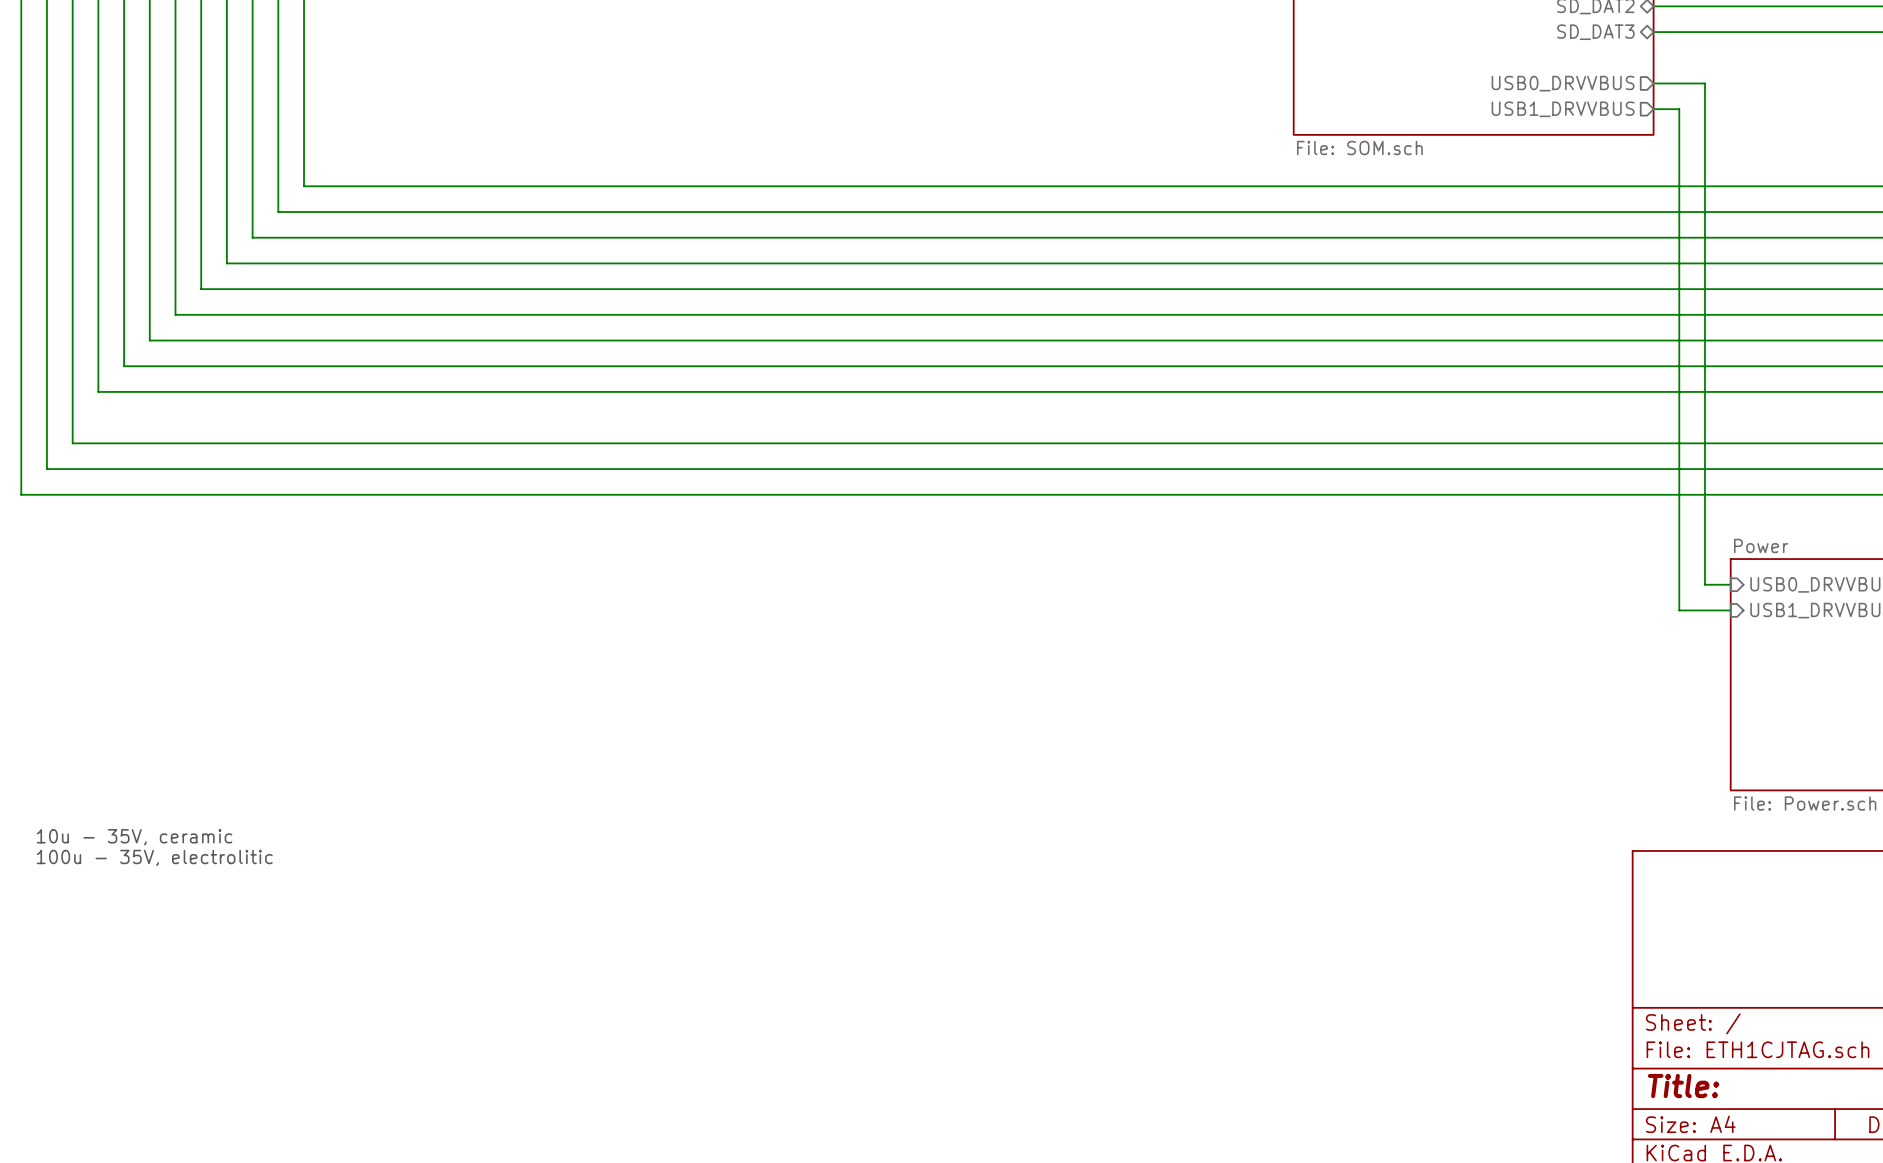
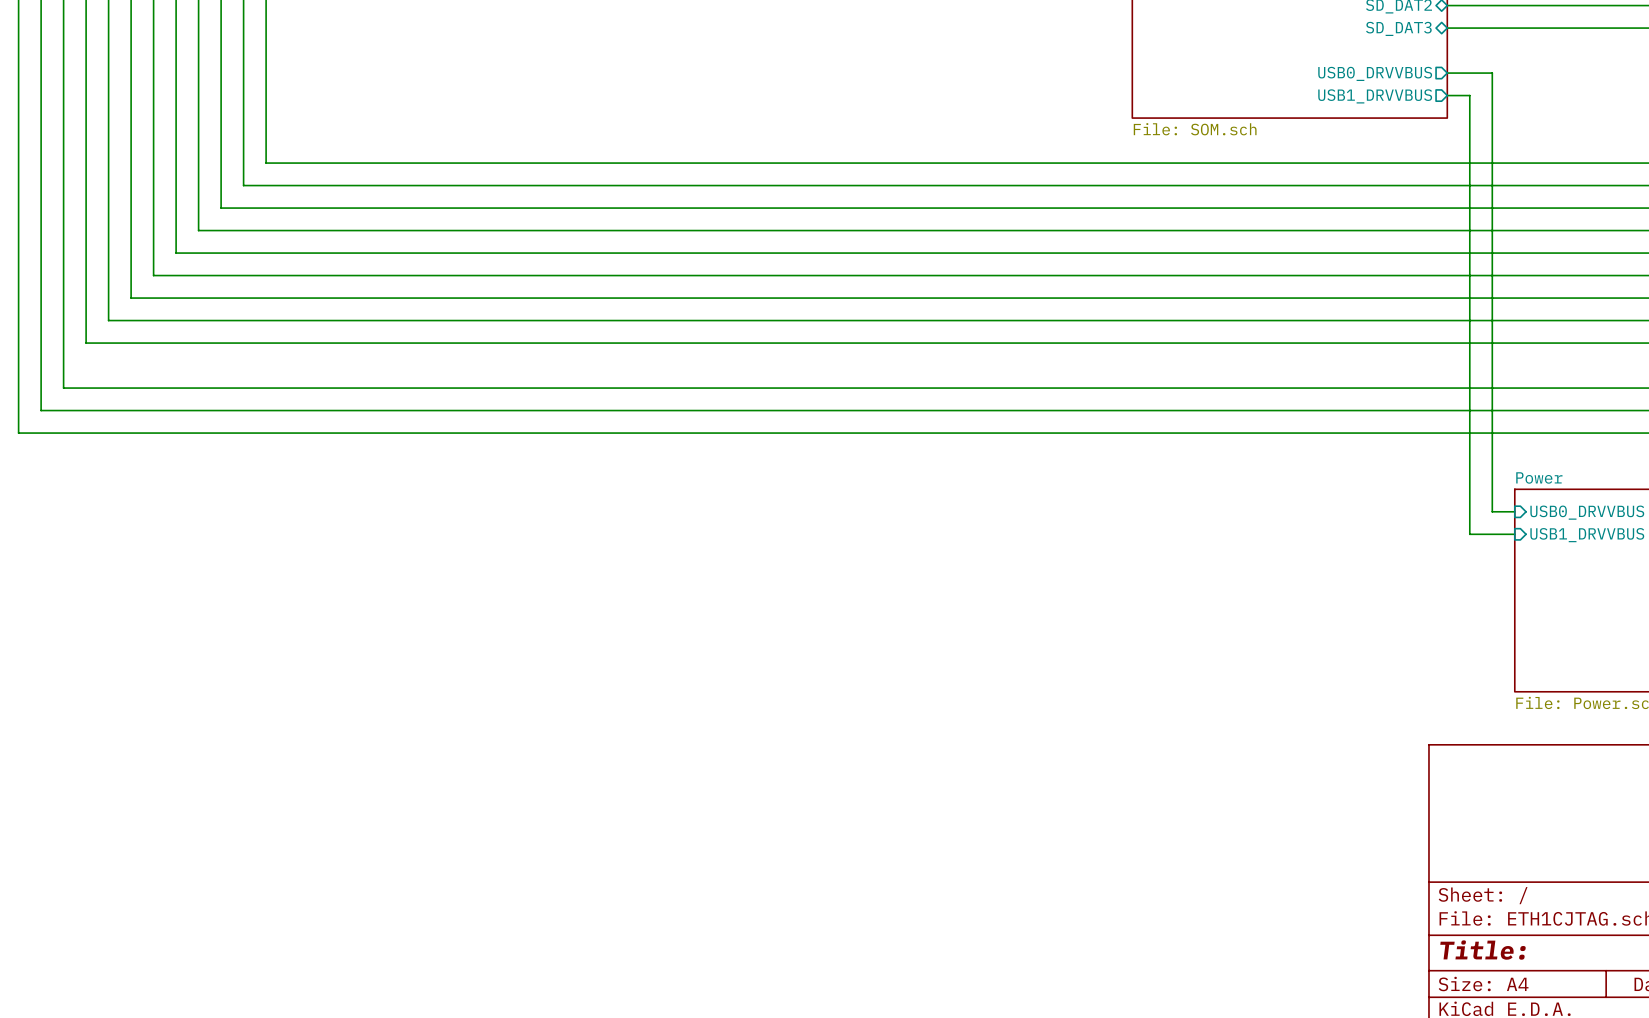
text: 10u - 35V, ceramic (134, 837) -> none
text: 100u - 35V, electrolitic (154, 857) -> none

